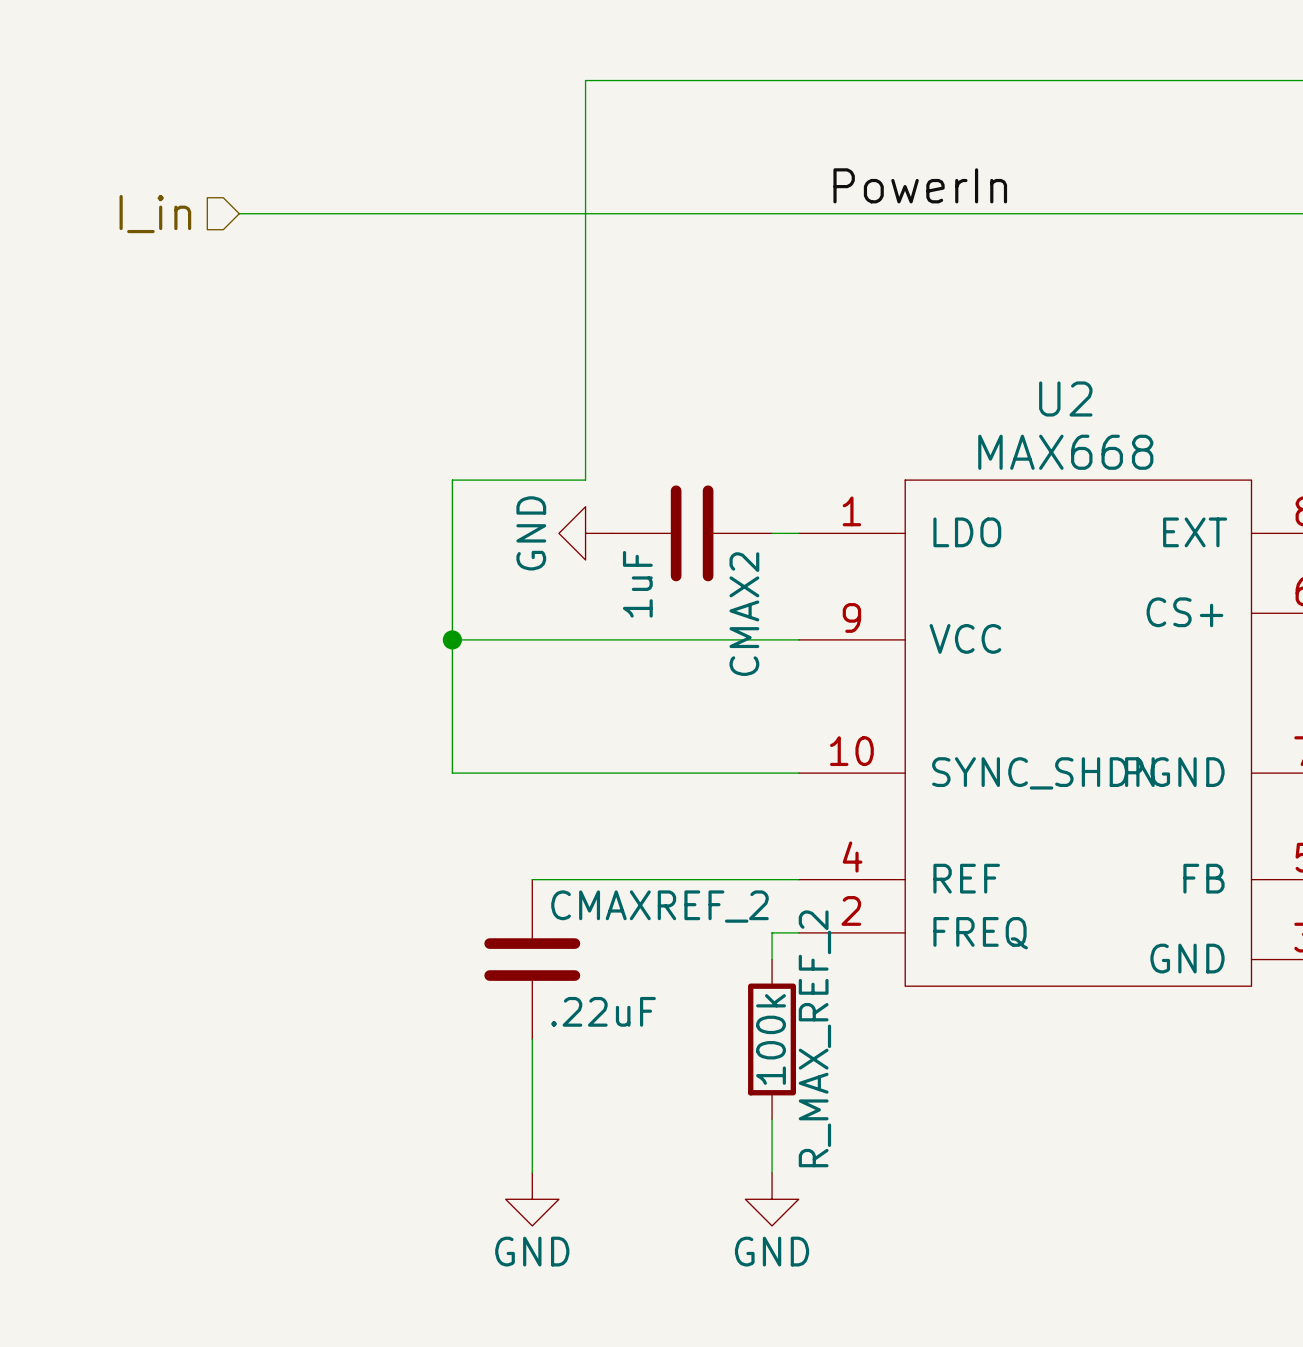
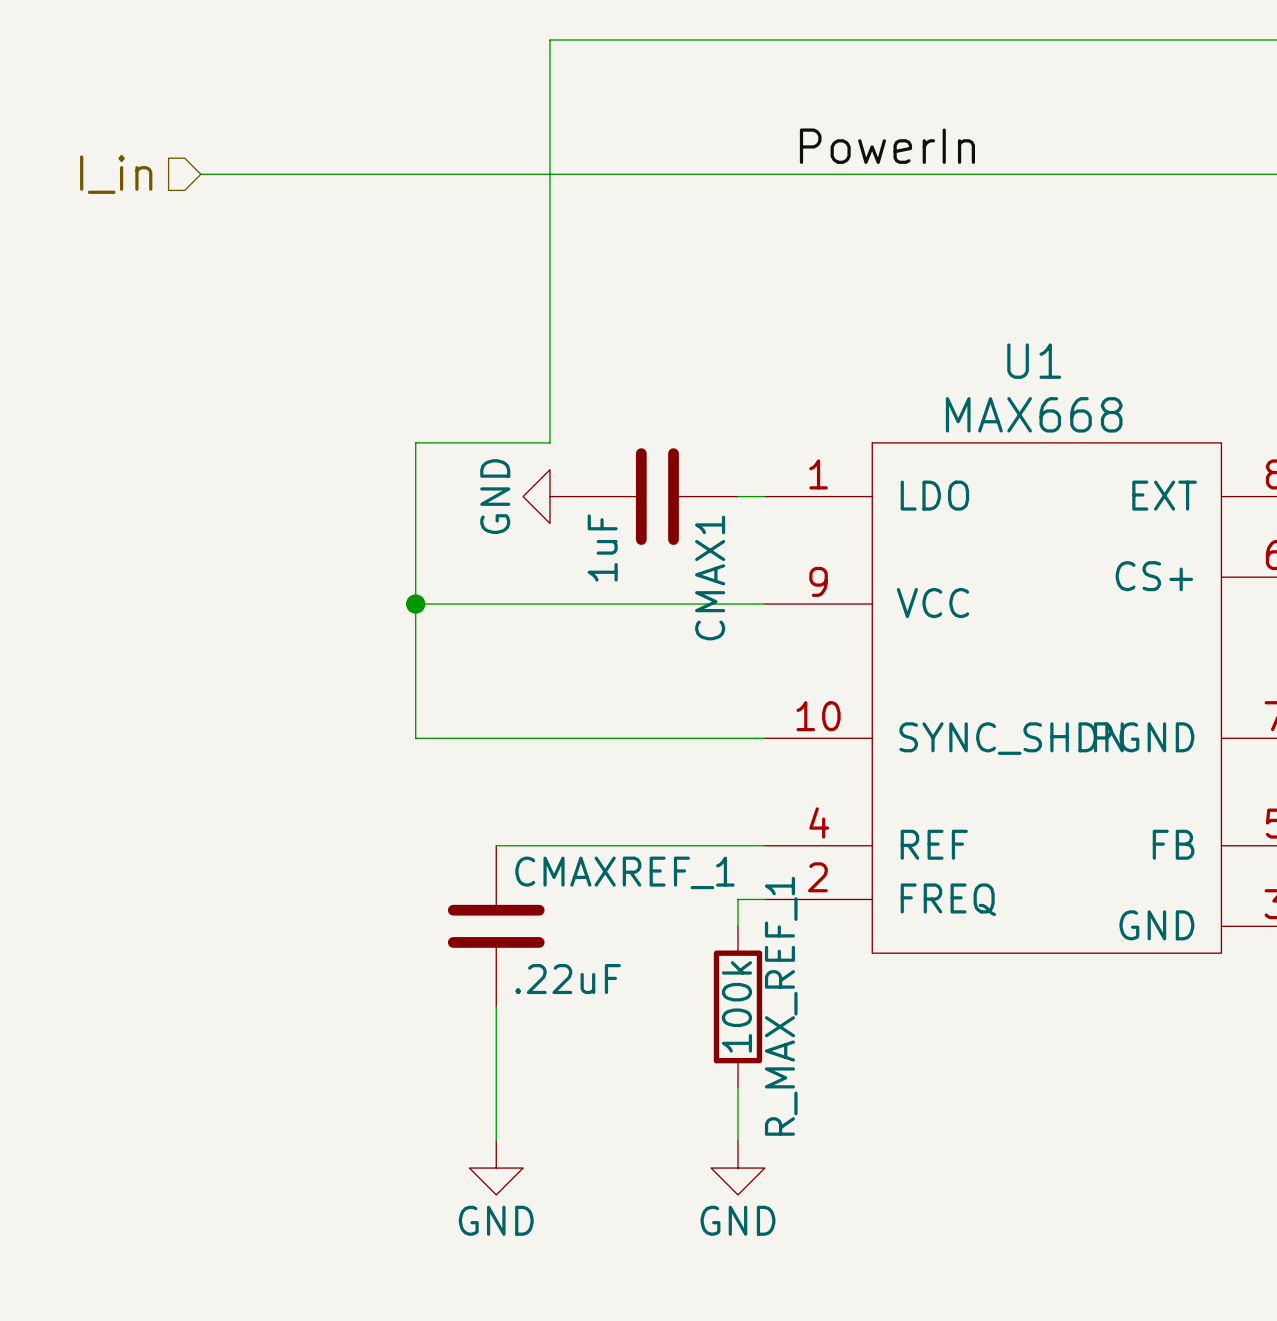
U2 name: U2 (1065, 398) -> U1 (1034, 361)
CMAX2 name: CMAX2 (744, 614) -> CMAX1 (710, 578)
CMAXREF_2 name: CMAXREF_2 (659, 906) -> CMAXREF_1 (625, 872)
R_MAX_REF_2 name: R_MAX_REF_2 (814, 1038) -> R_MAX_REF_1 (781, 1006)

